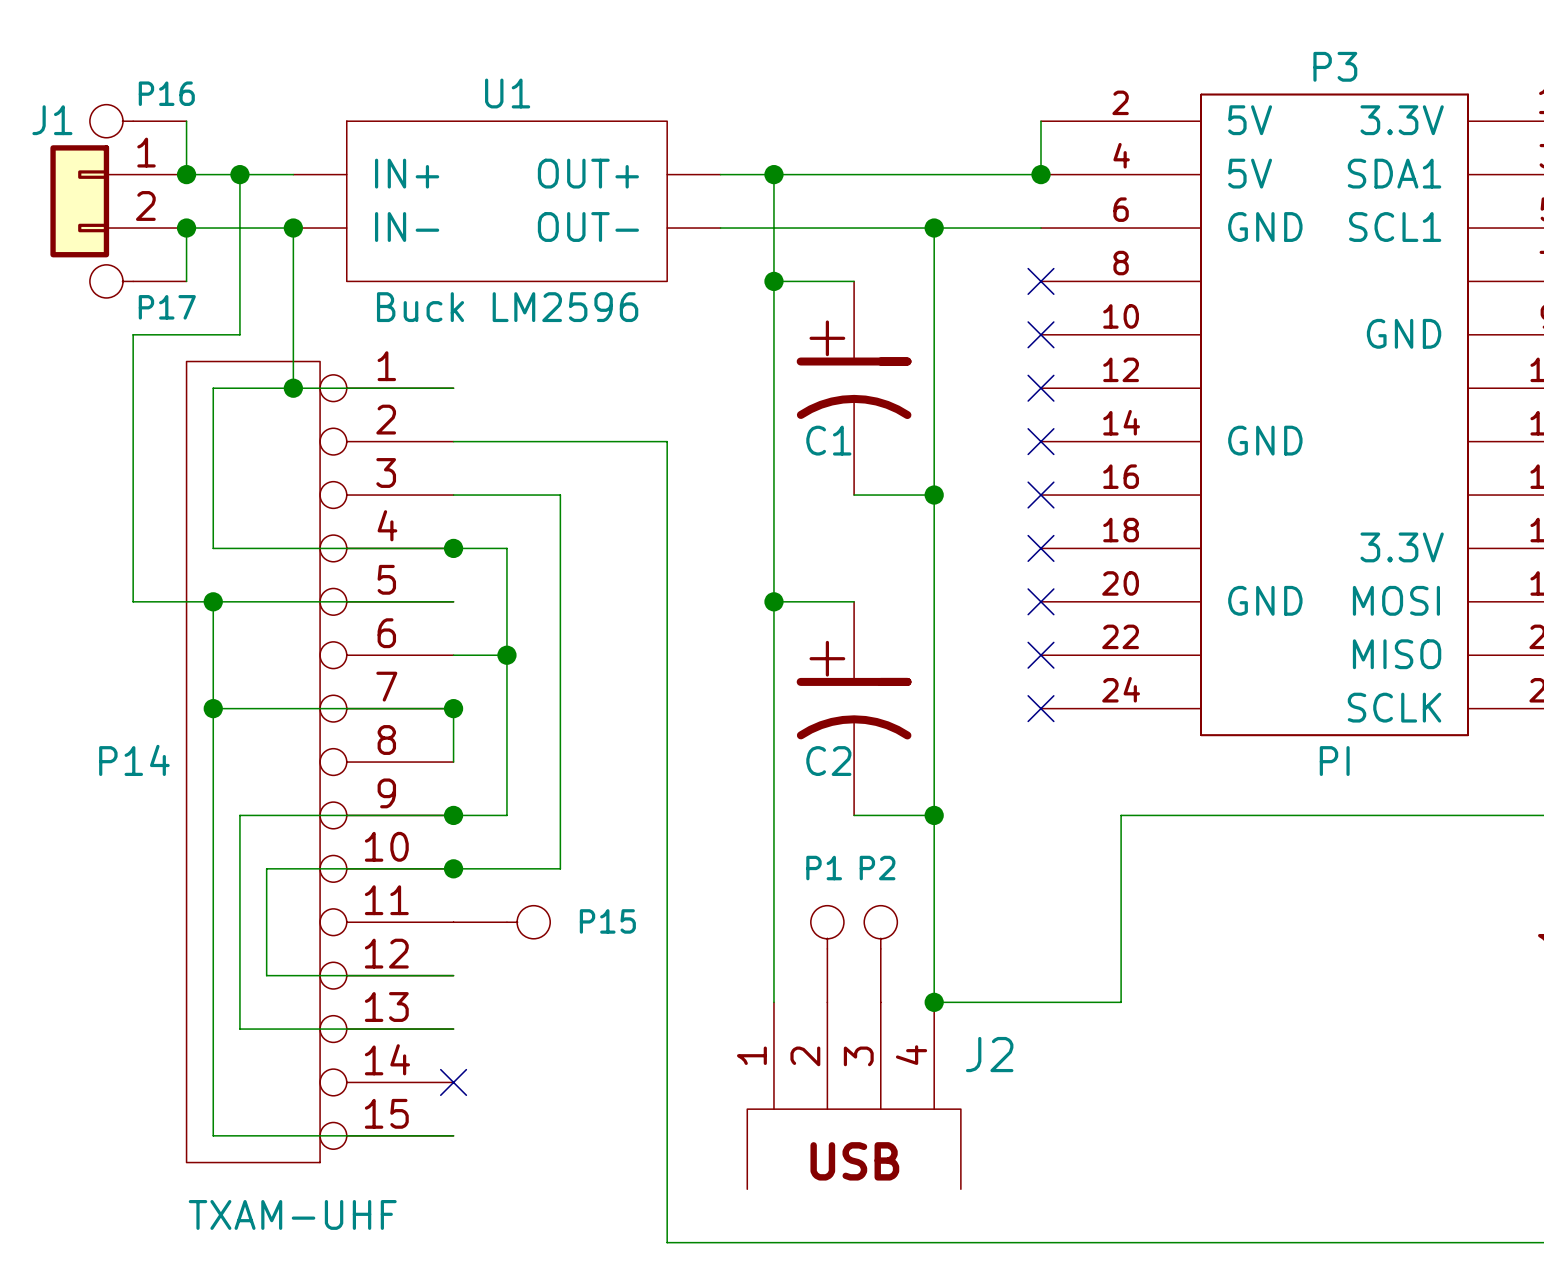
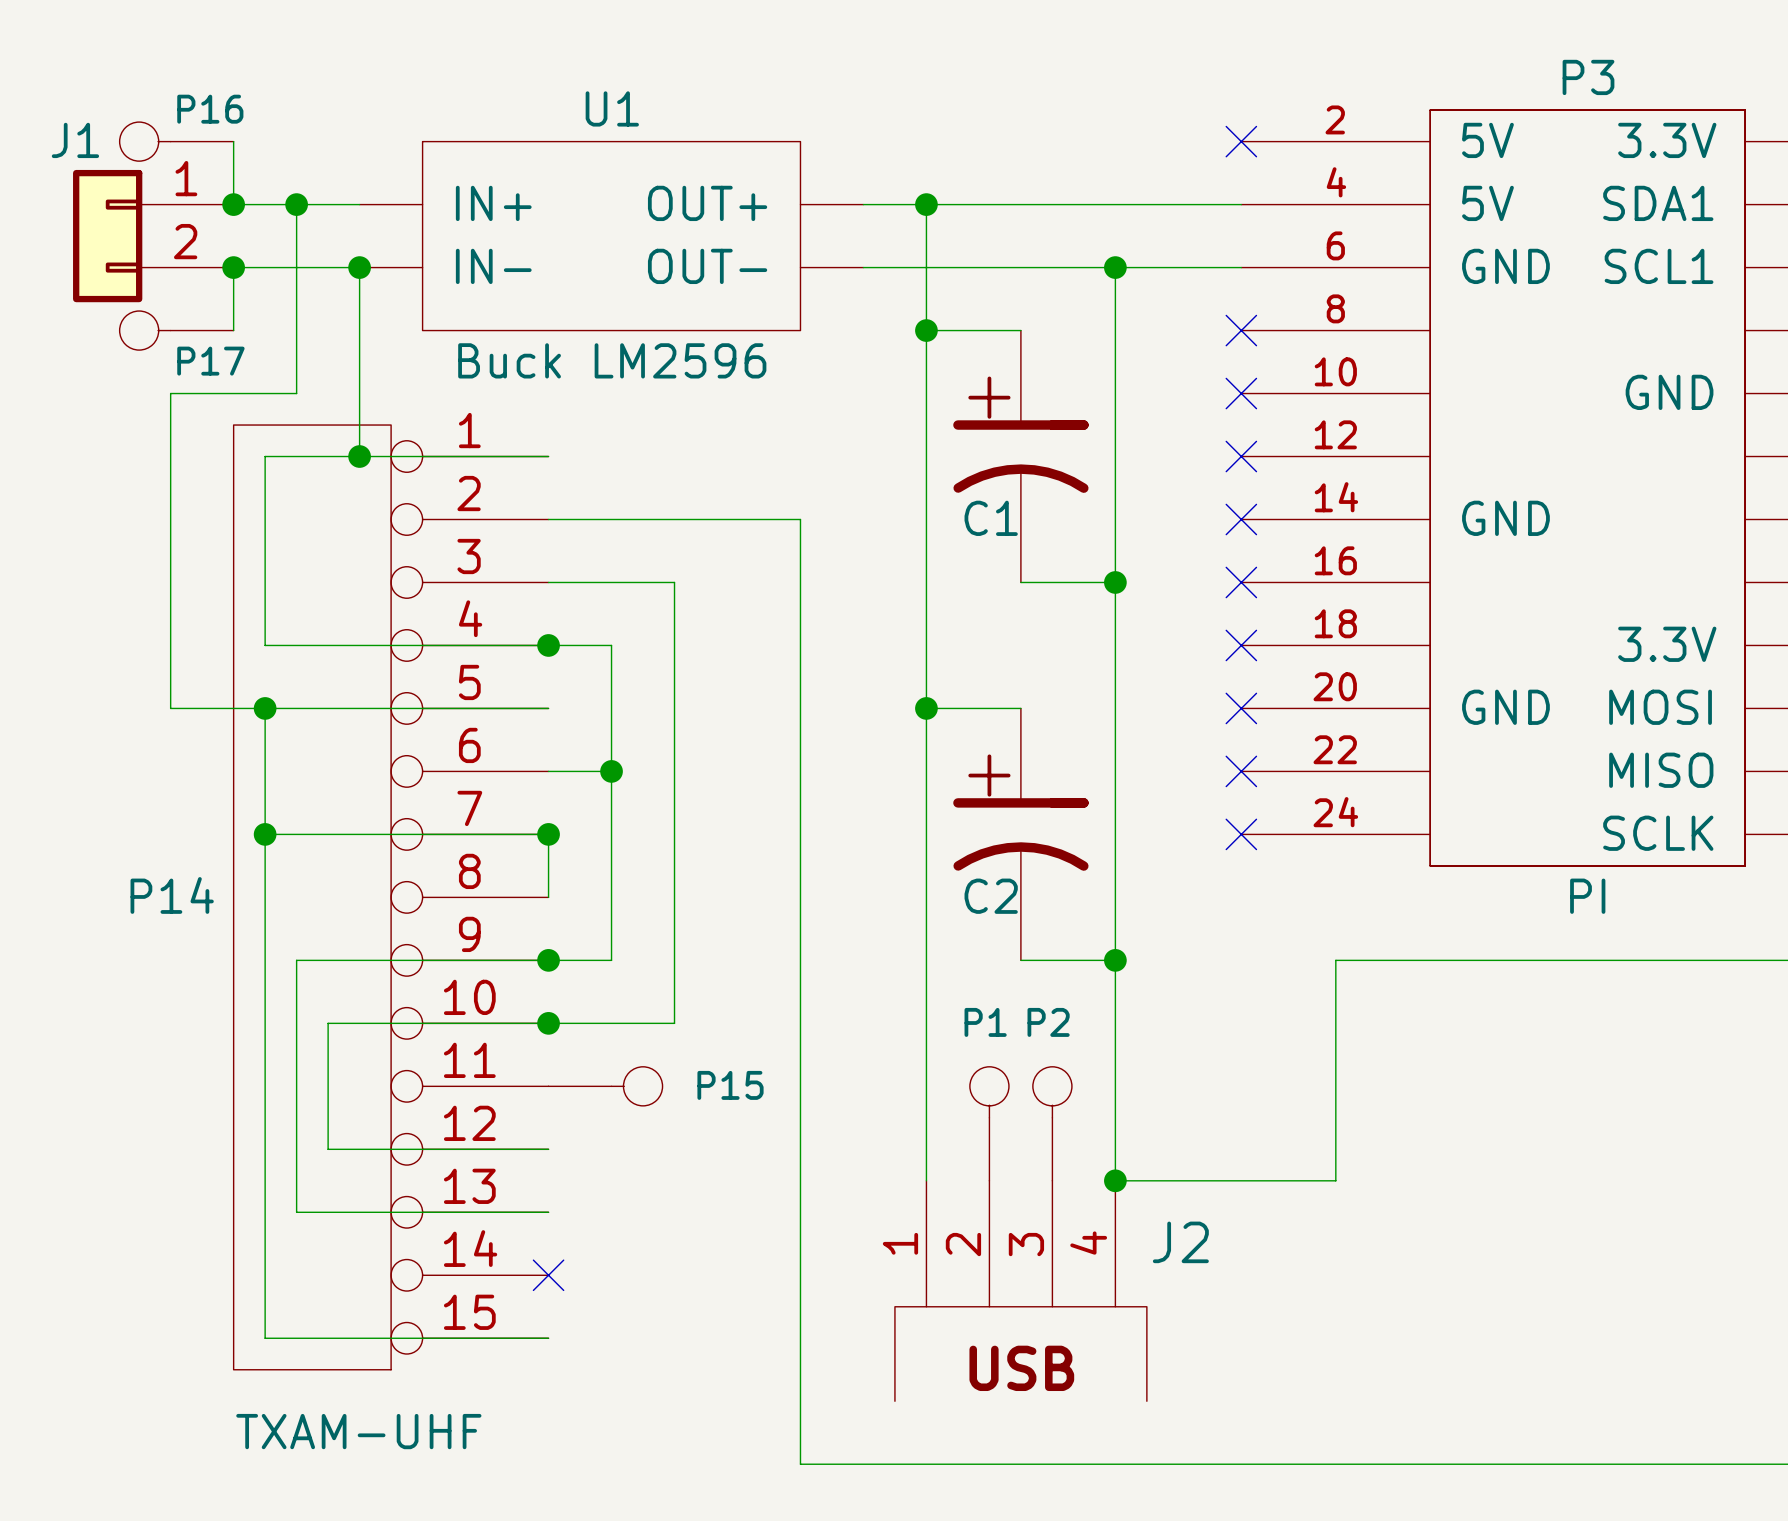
wire: (1040, 121) (1040, 174) -> none
no-connect mark: none -> (1241, 141)
junction: (1040, 174) -> none

